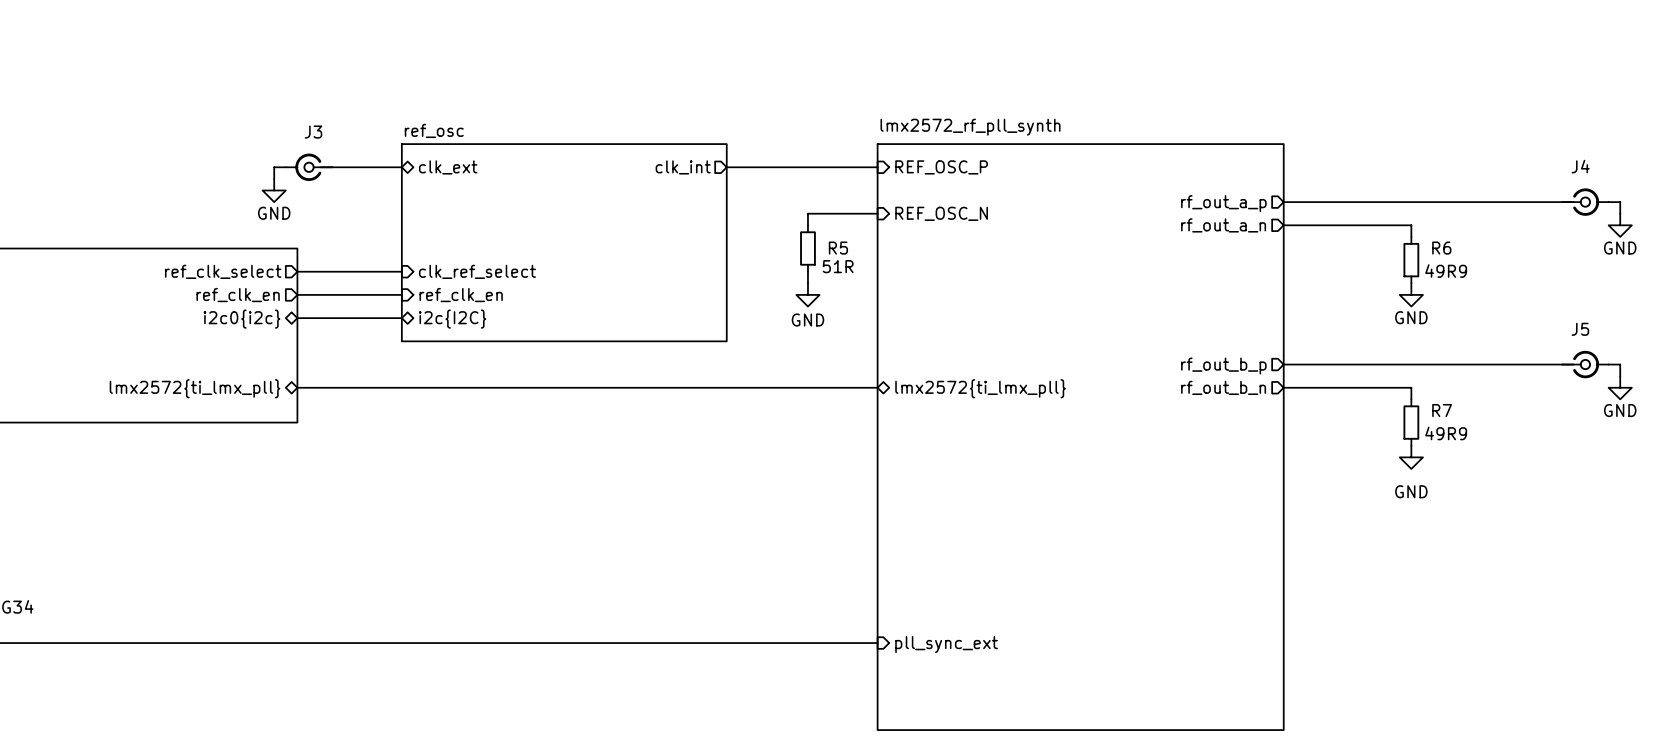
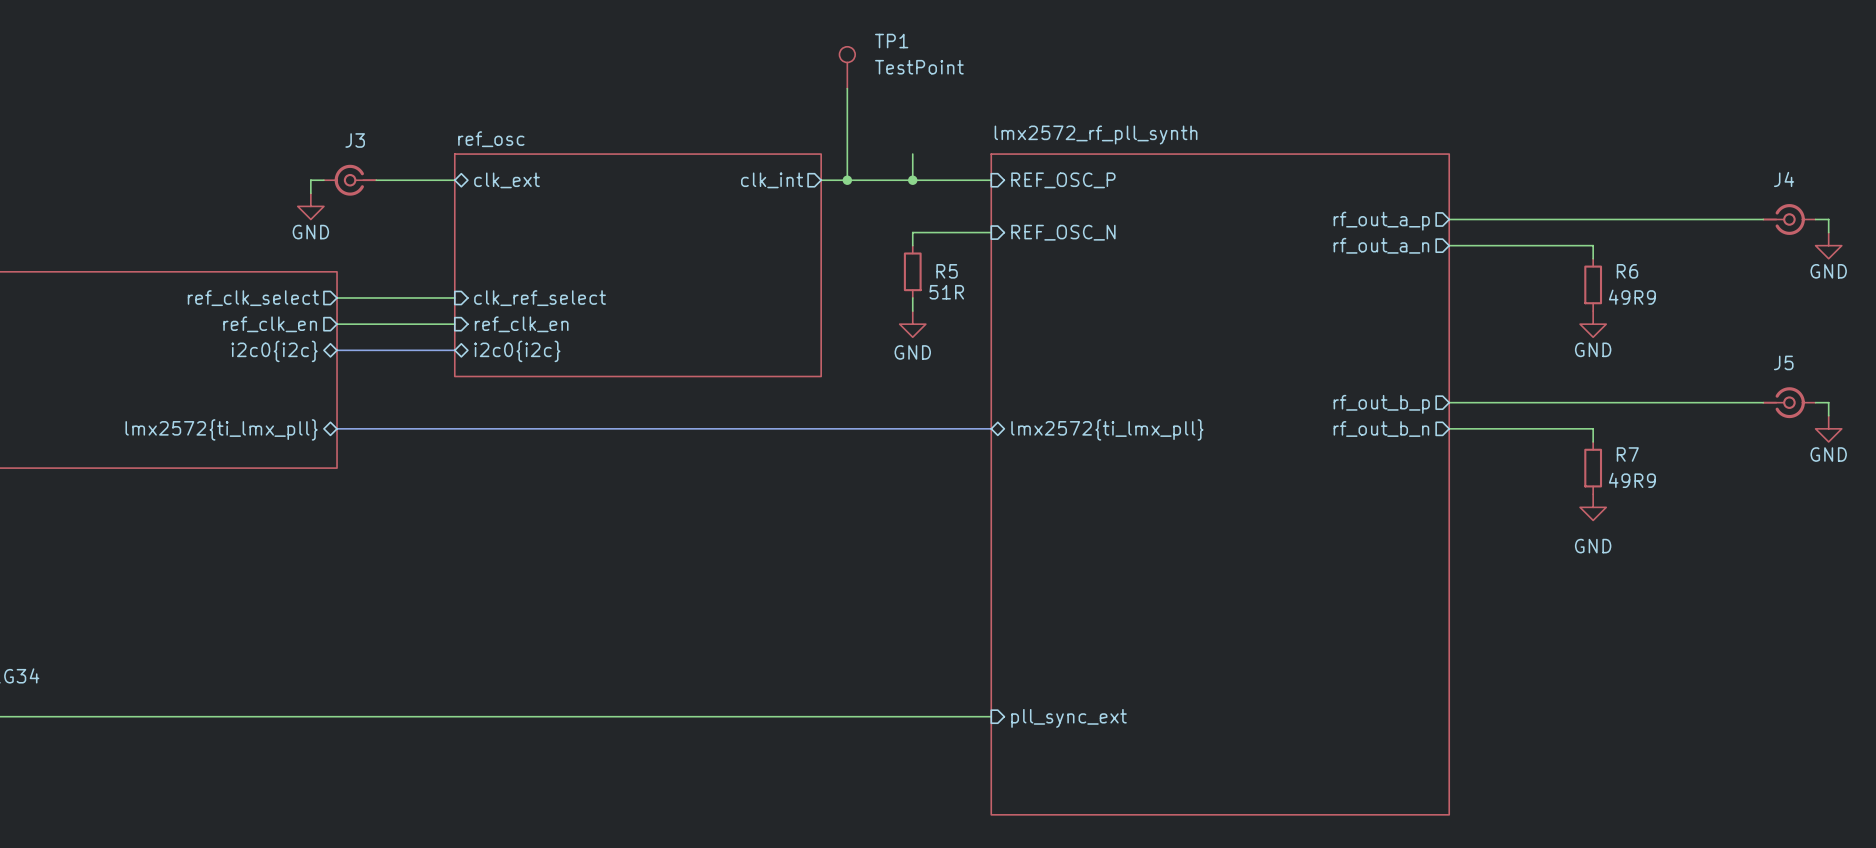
TP1: none -> TestPoint (847, 67)
wire: none -> (847, 88) (847, 180)
wire: none -> (912, 154) (912, 180)
junction: none -> (847, 180)
junction: none -> (912, 180)
sheet pin: i2c{I2C} (452, 319) -> i2c0{i2c} (517, 351)

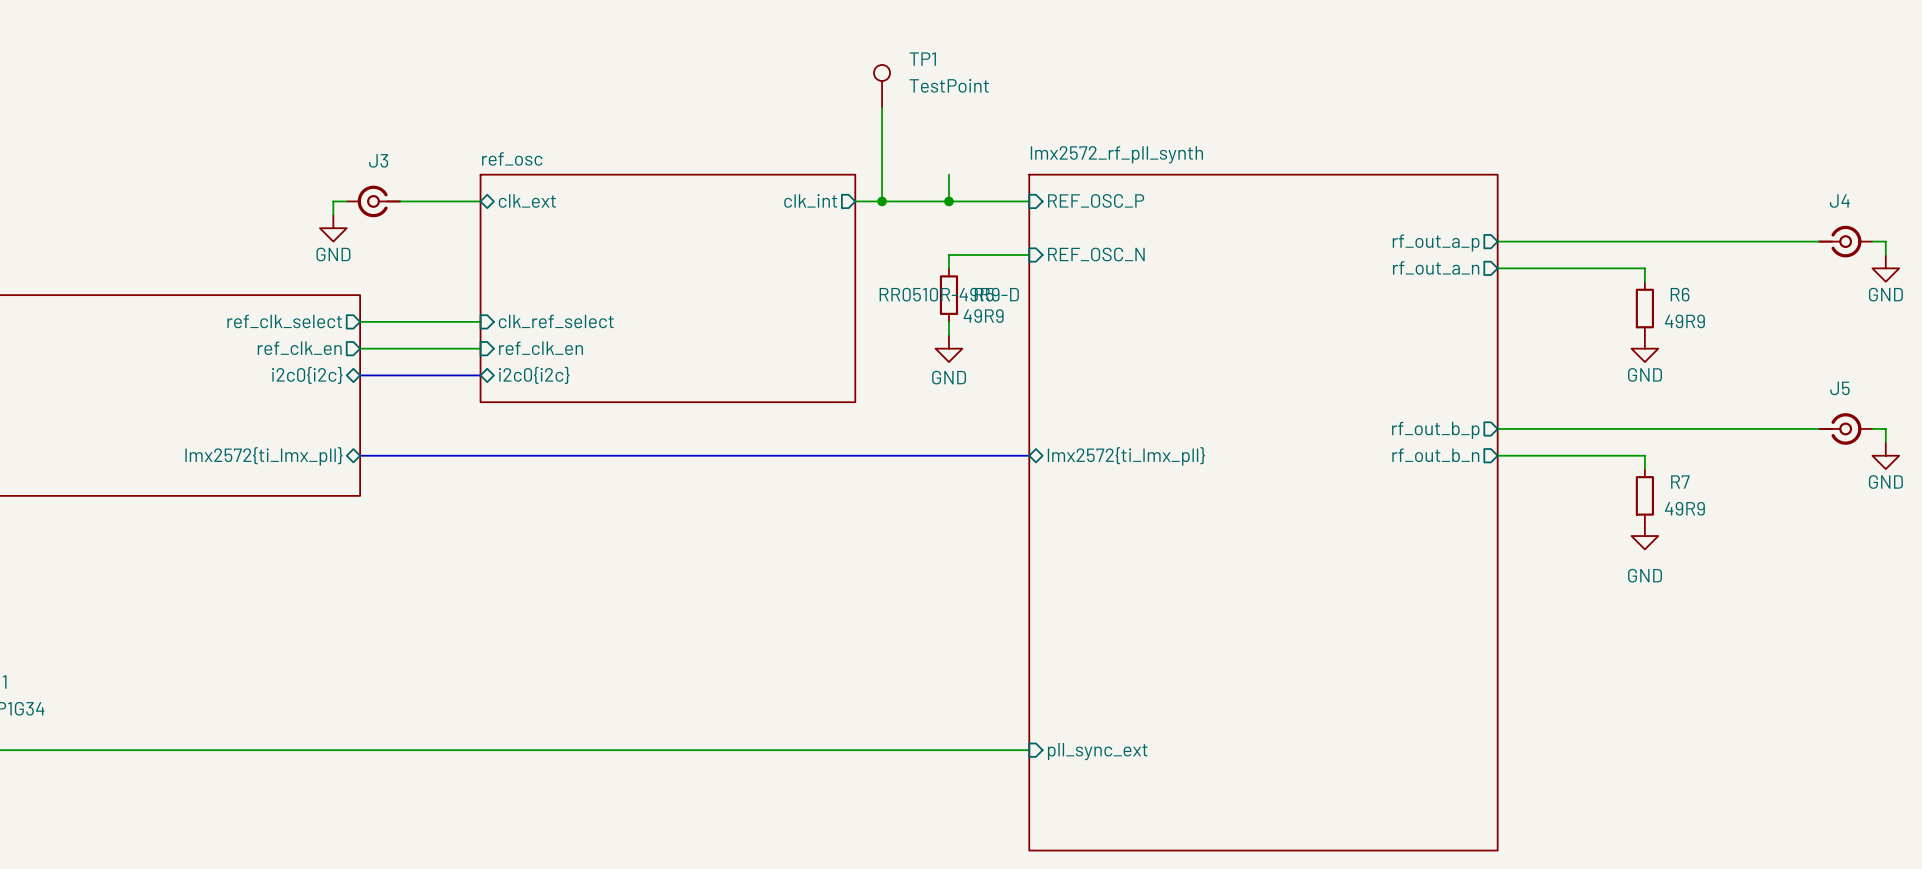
R5 text: none -> RR0510R-49R9-D (949, 294)
R5 value: 51R (946, 292) -> 49R9 (983, 316)

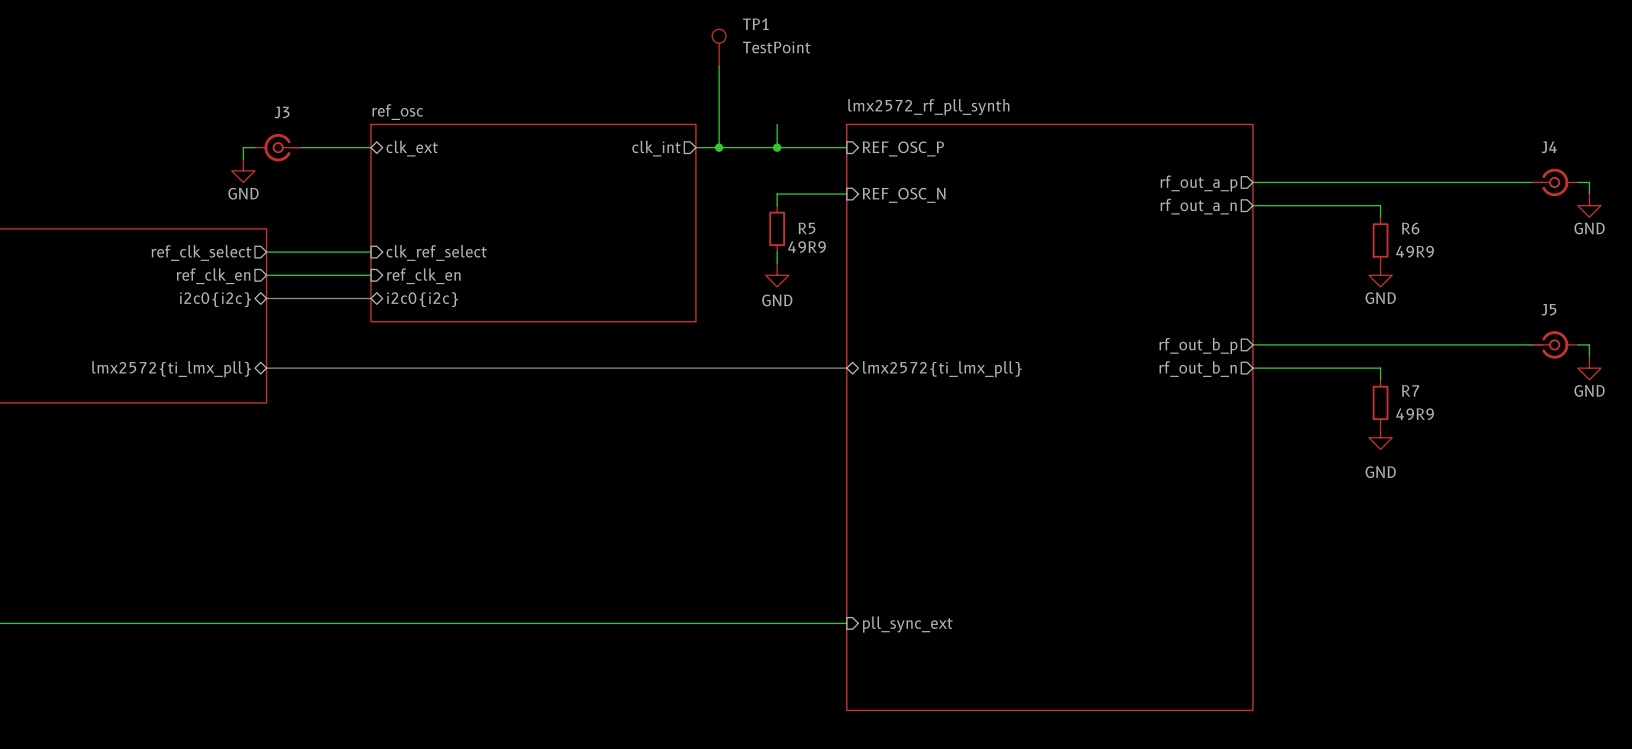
R5 text: RR0510R-49R9-D (949, 294) -> none

